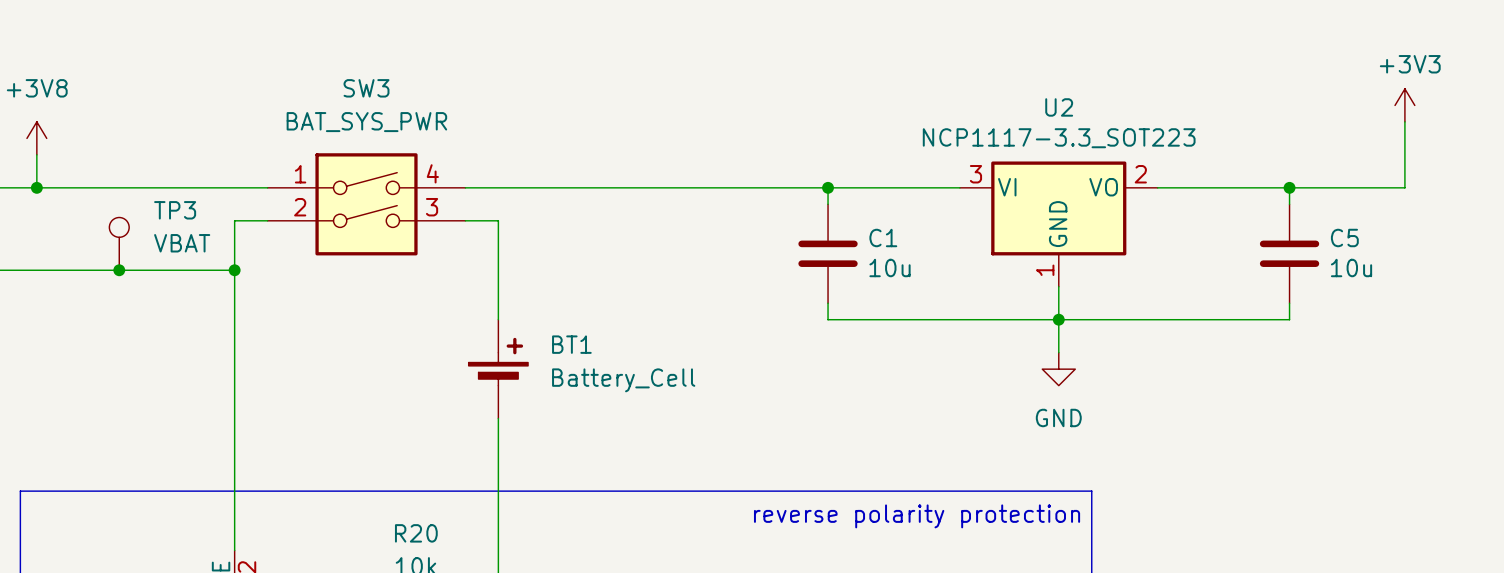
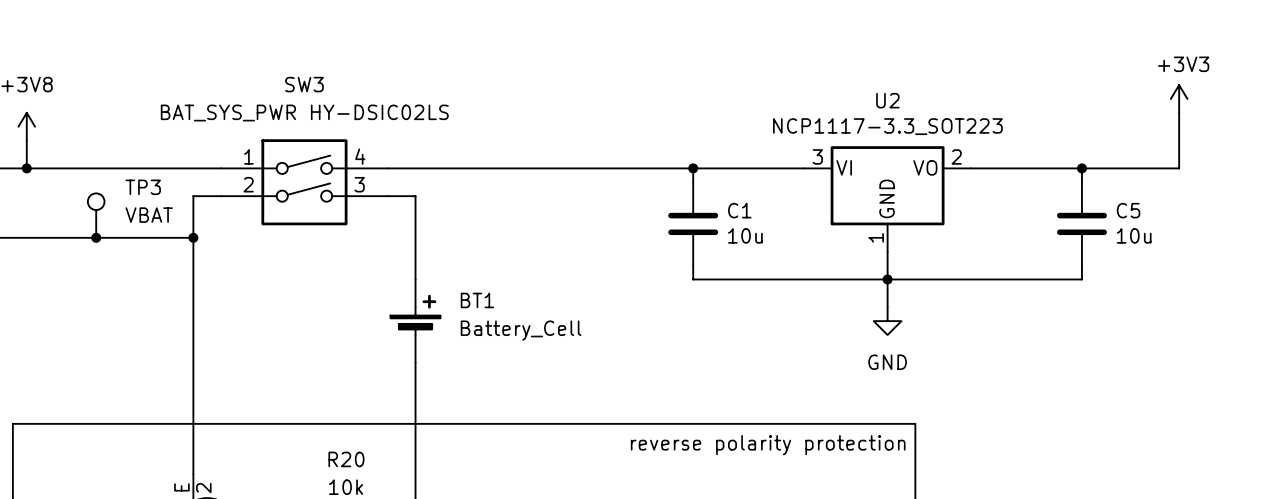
SW3 value: BAT_SYS_PWR (366, 122) -> BAT_SYS_PWR HY-DSIC02LS (304, 113)

